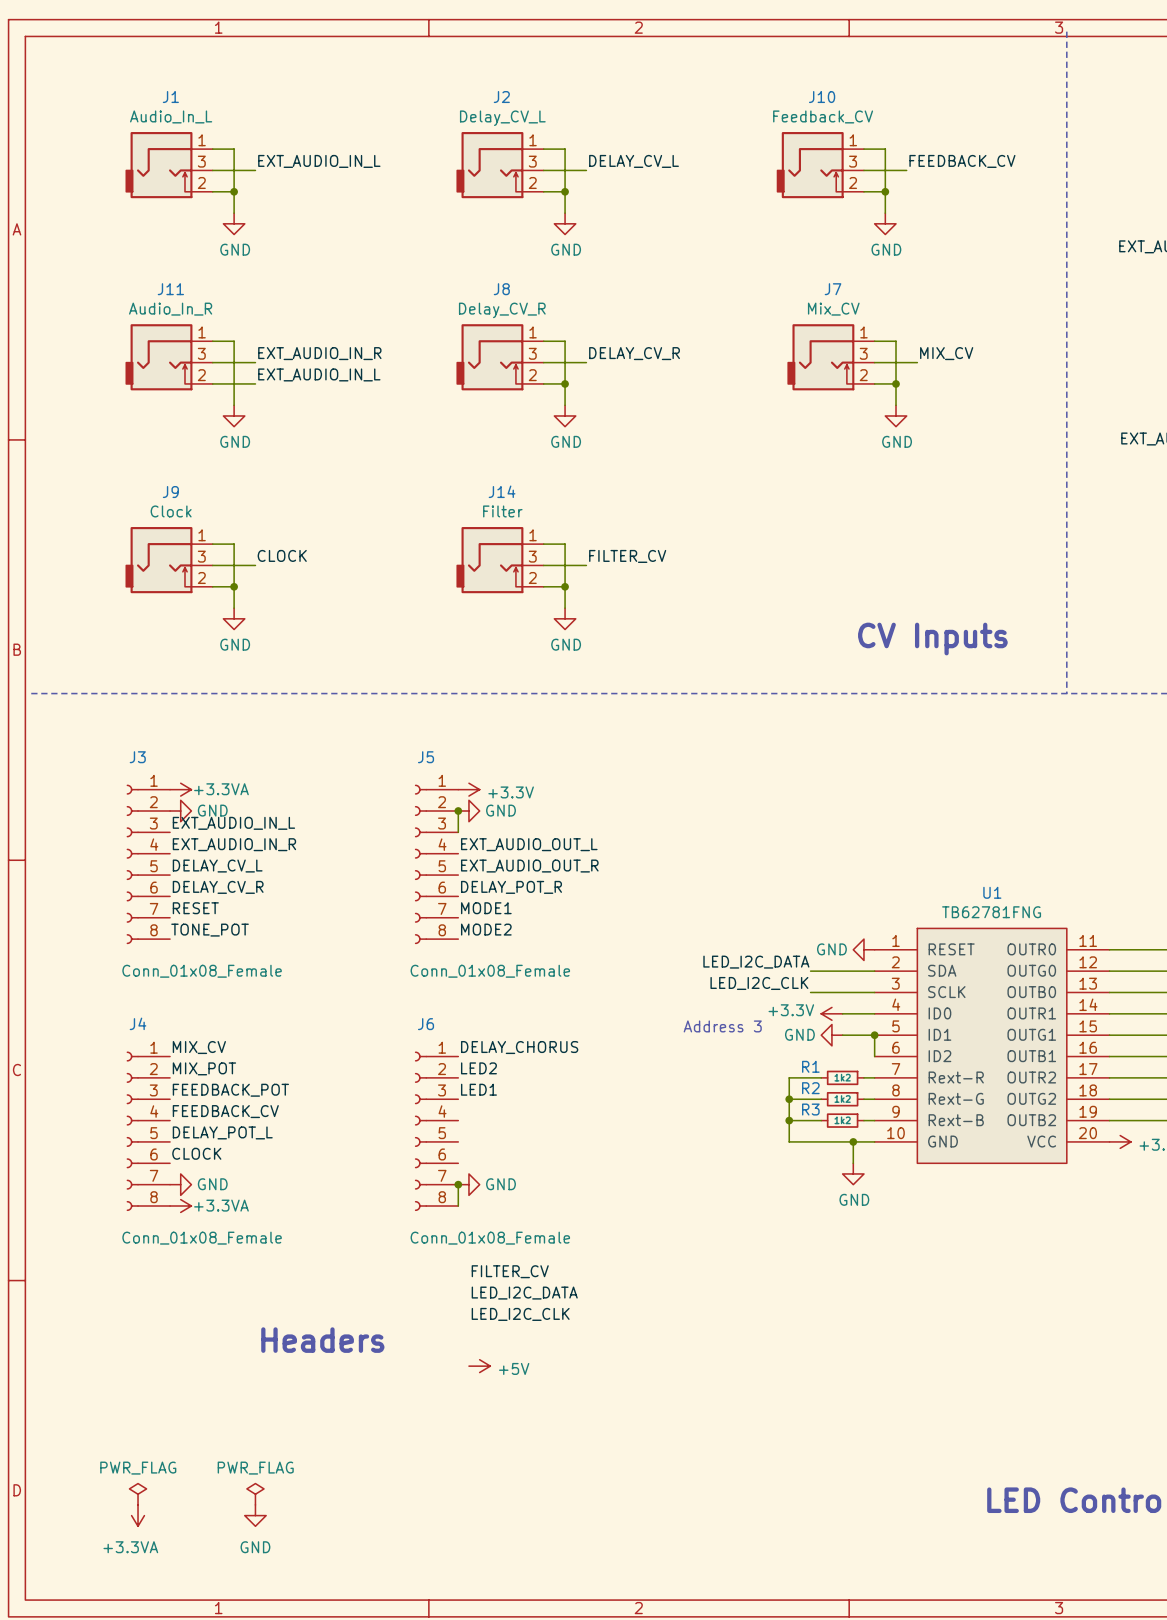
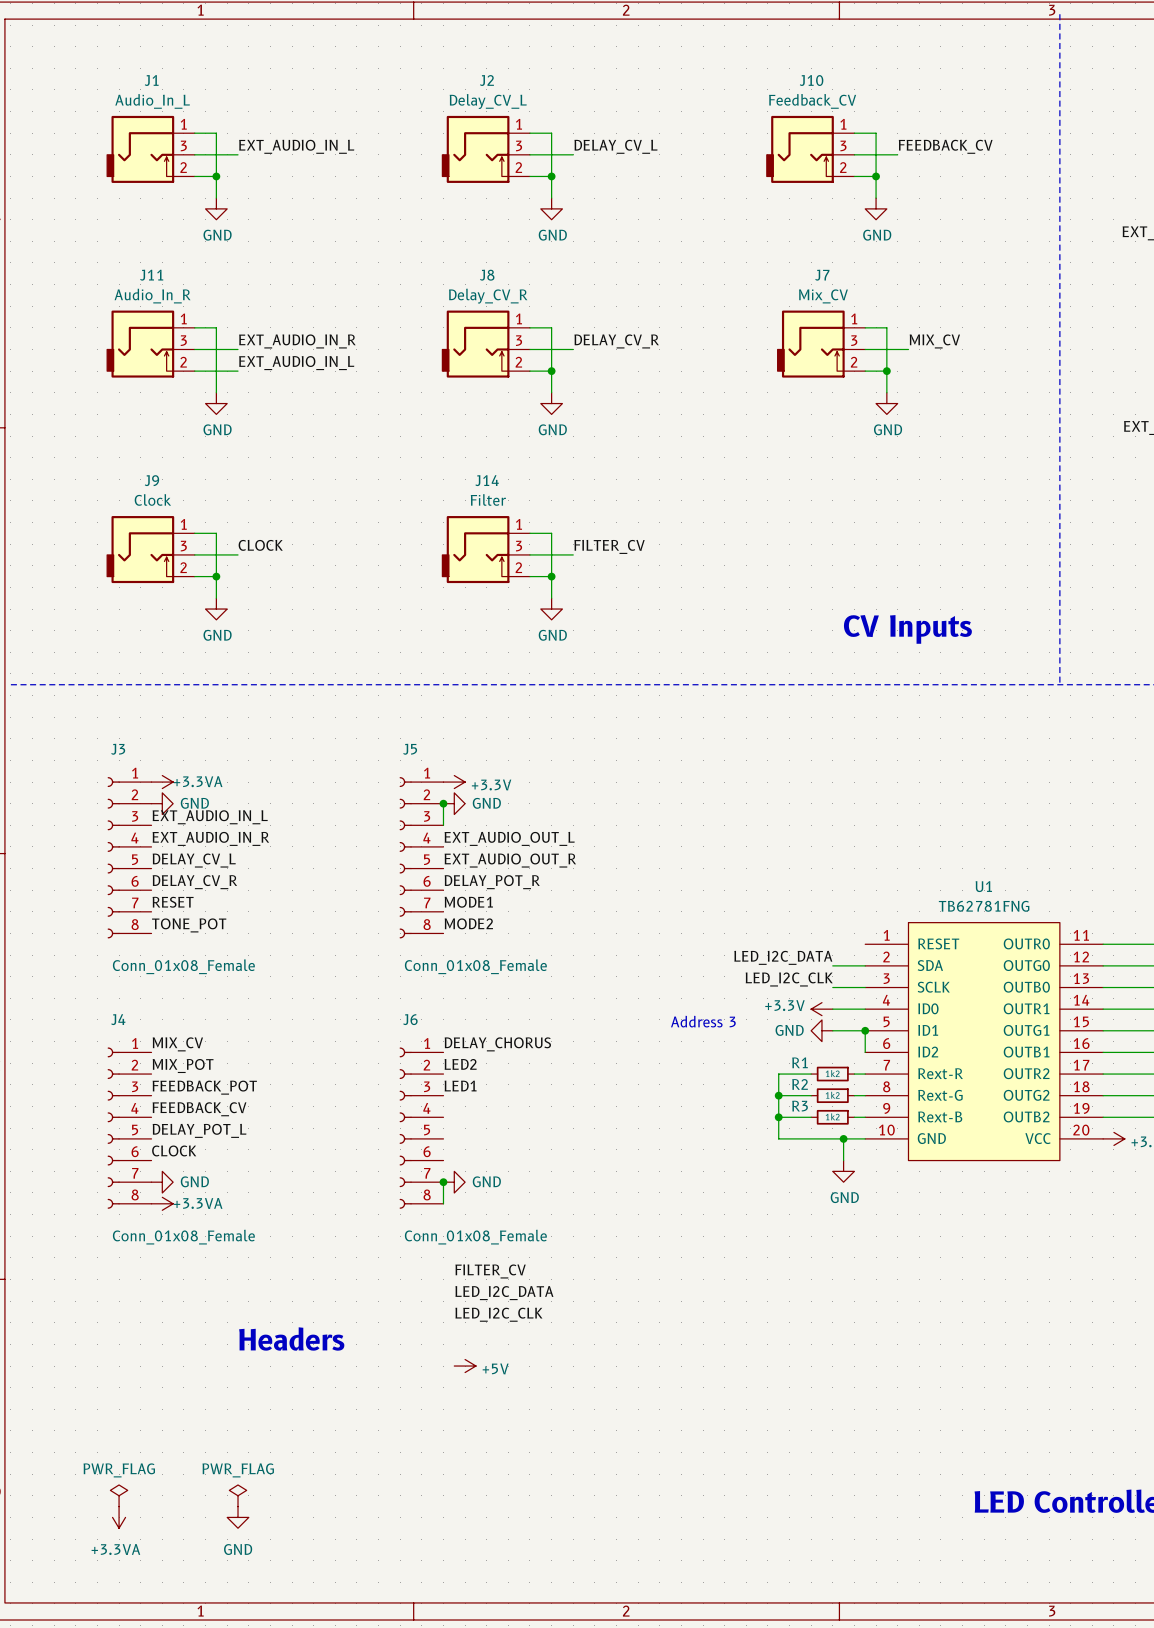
power symbol: GND (863, 949) -> none
label position: LED_I2C_DATA (756, 962) -> LED_I2C_DATA (783, 957)
wire: (810, 971) (842, 971) -> none
label position: LED_I2C_CLK (759, 983) -> LED_I2C_CLK (789, 979)
wire: (810, 992) (842, 992) -> none

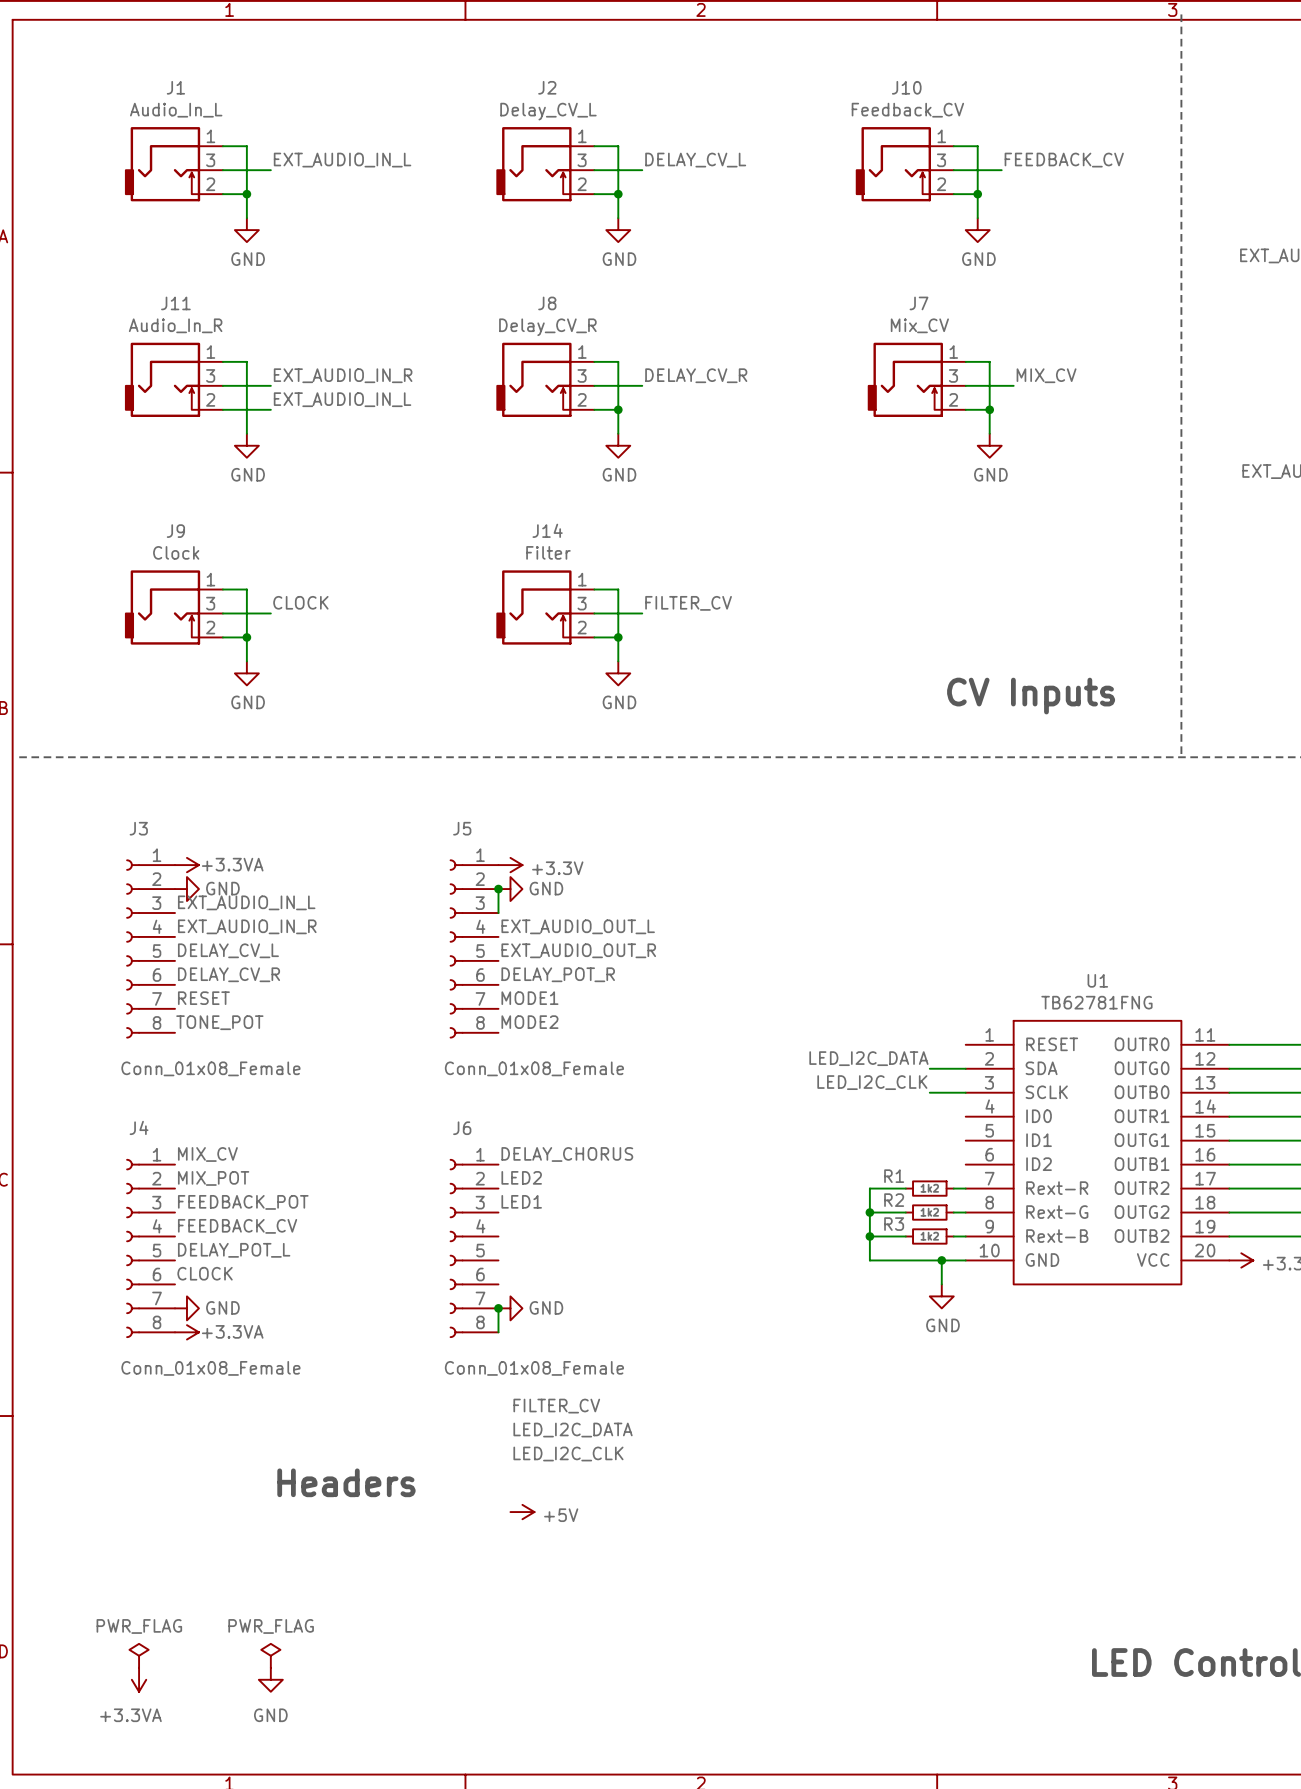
power symbol: +3.3V (821, 1009) -> none
wire: (832, 1009) (865, 1009) -> none
text: Address 3 (703, 1021) -> none
power symbol: GND (821, 1030) -> none
wire: (832, 1030) (865, 1030) (865, 1052) -> none
junction: (865, 1030) -> none

